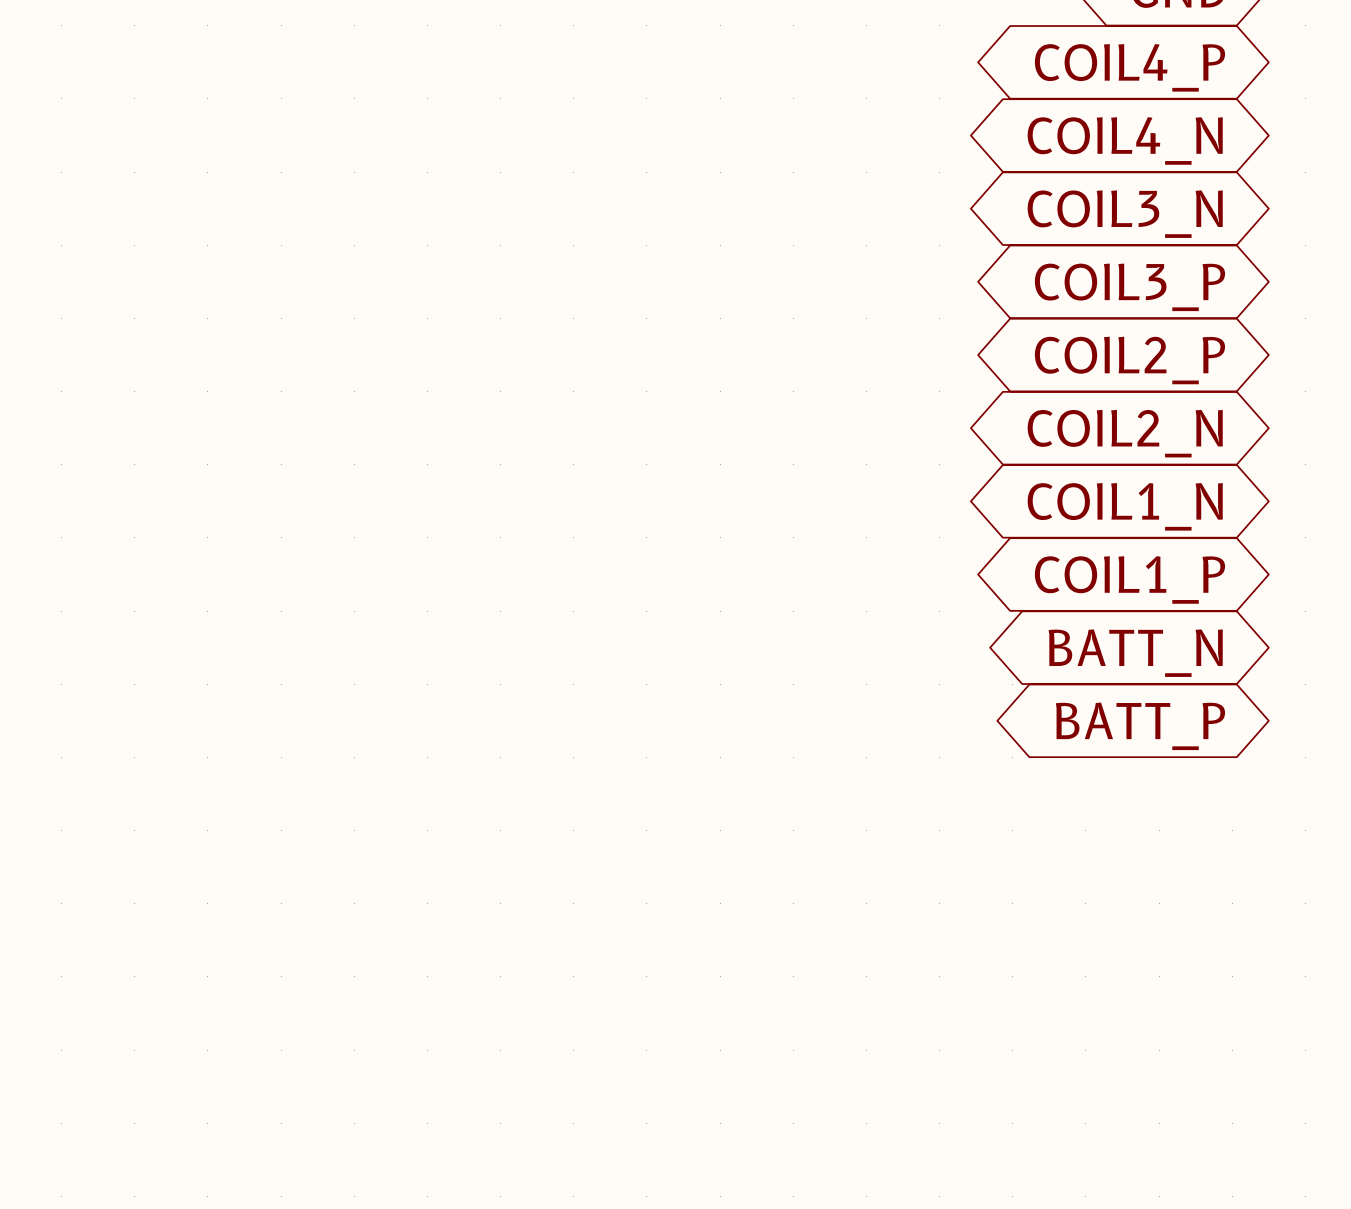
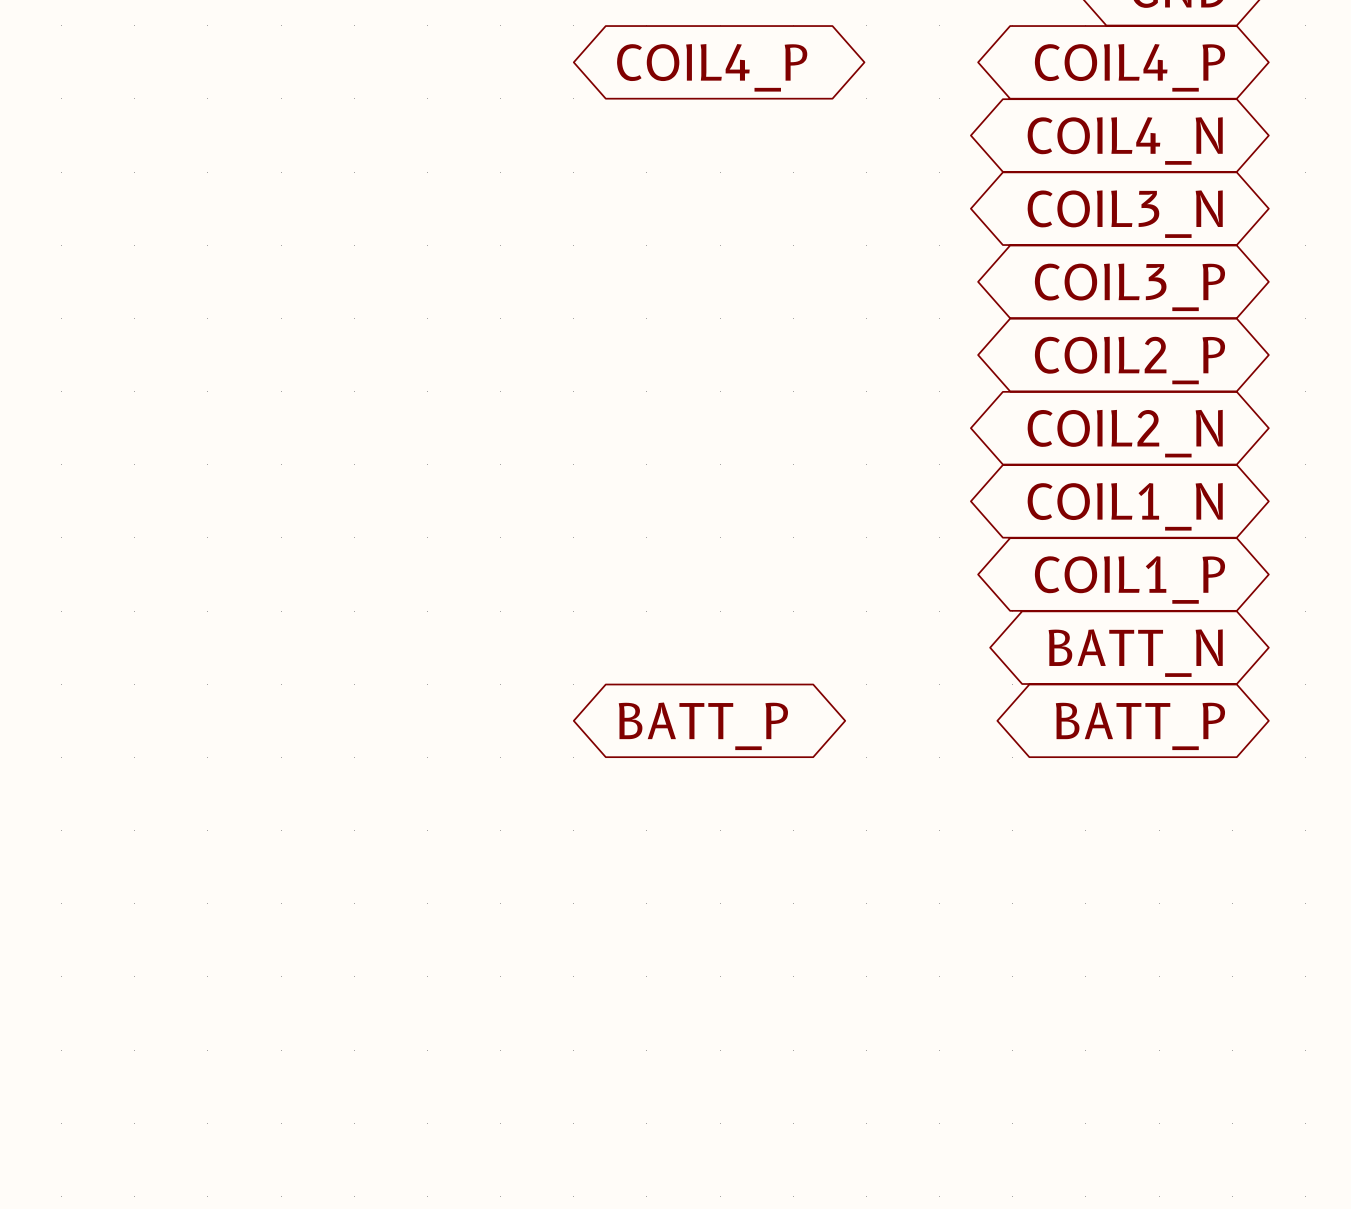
global label: none -> COIL4_P (712, 67)
global label: none -> BATT_P (703, 726)

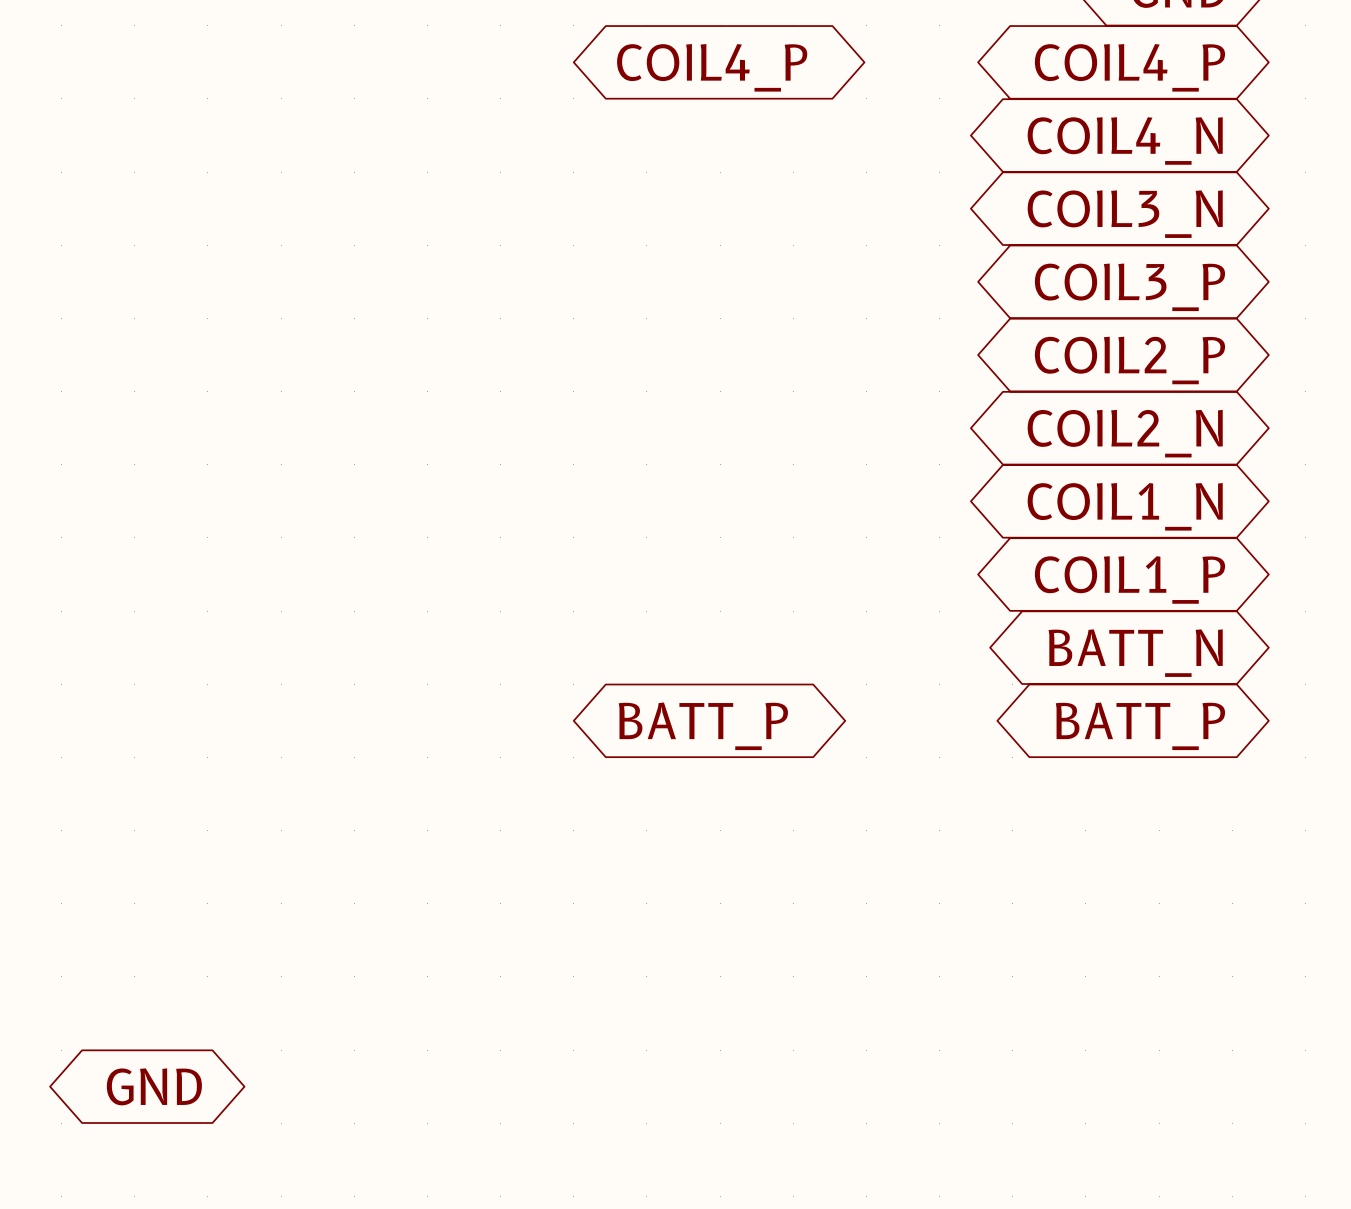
global label: none -> GND (154, 1086)

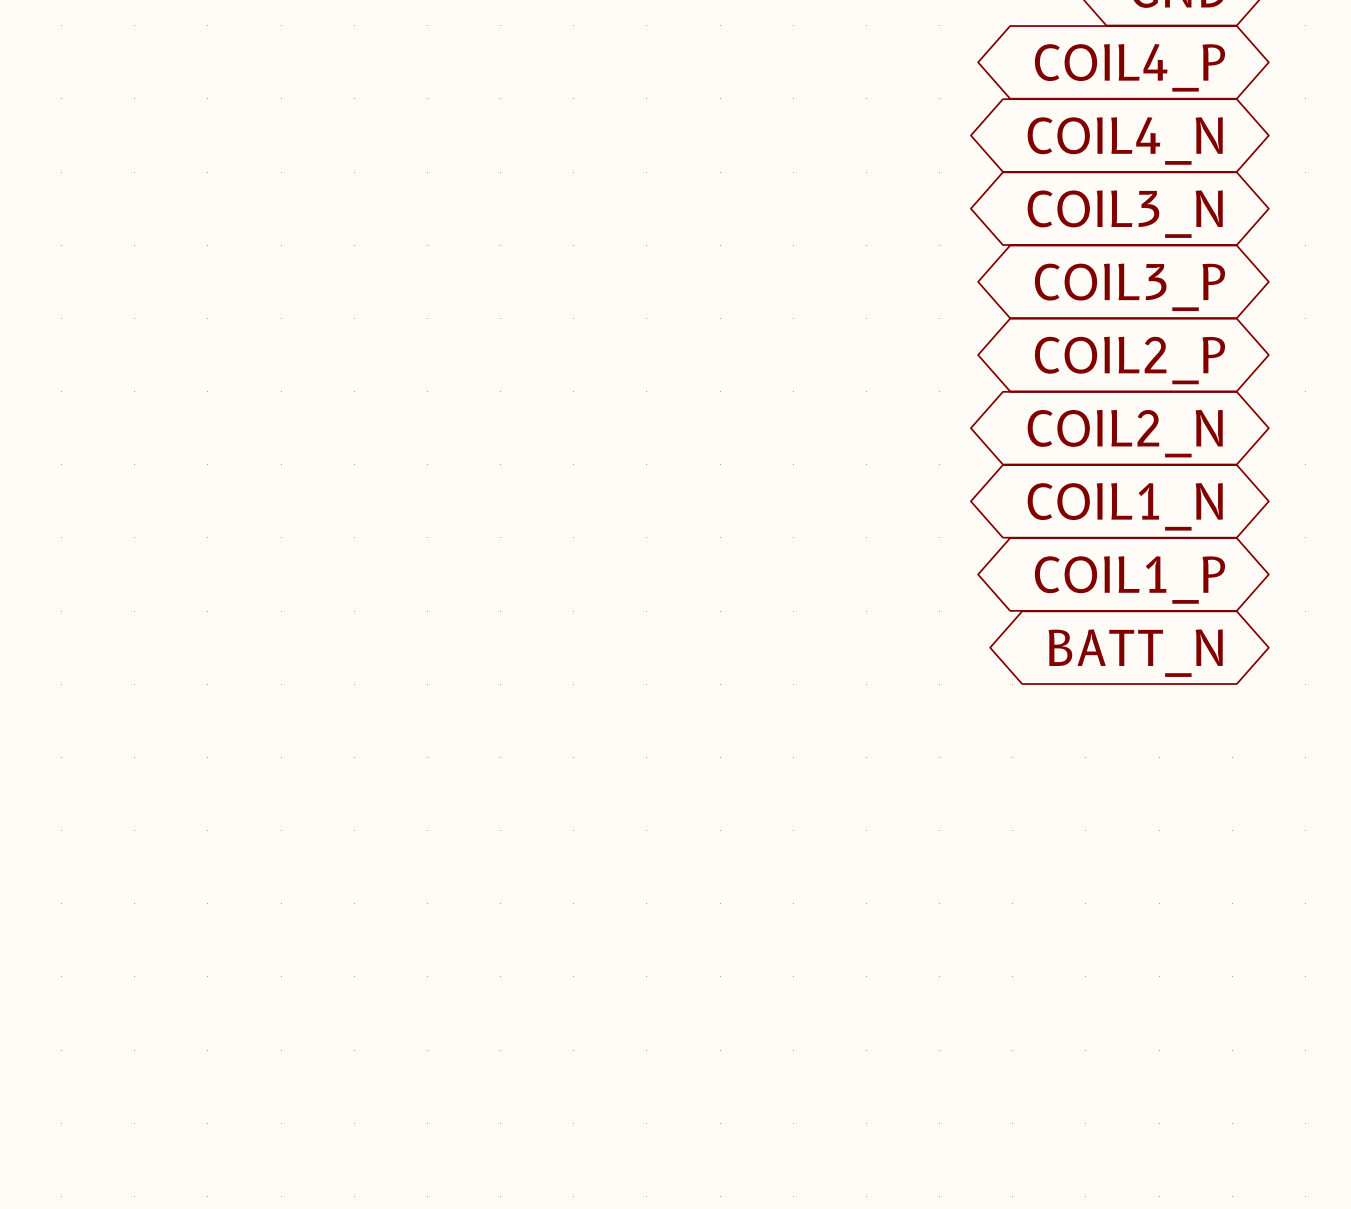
global label: COIL4_P (712, 67) -> none
global label: BATT_P (703, 726) -> none
global label: BATT_P (1140, 726) -> none
global label: GND (154, 1086) -> none

